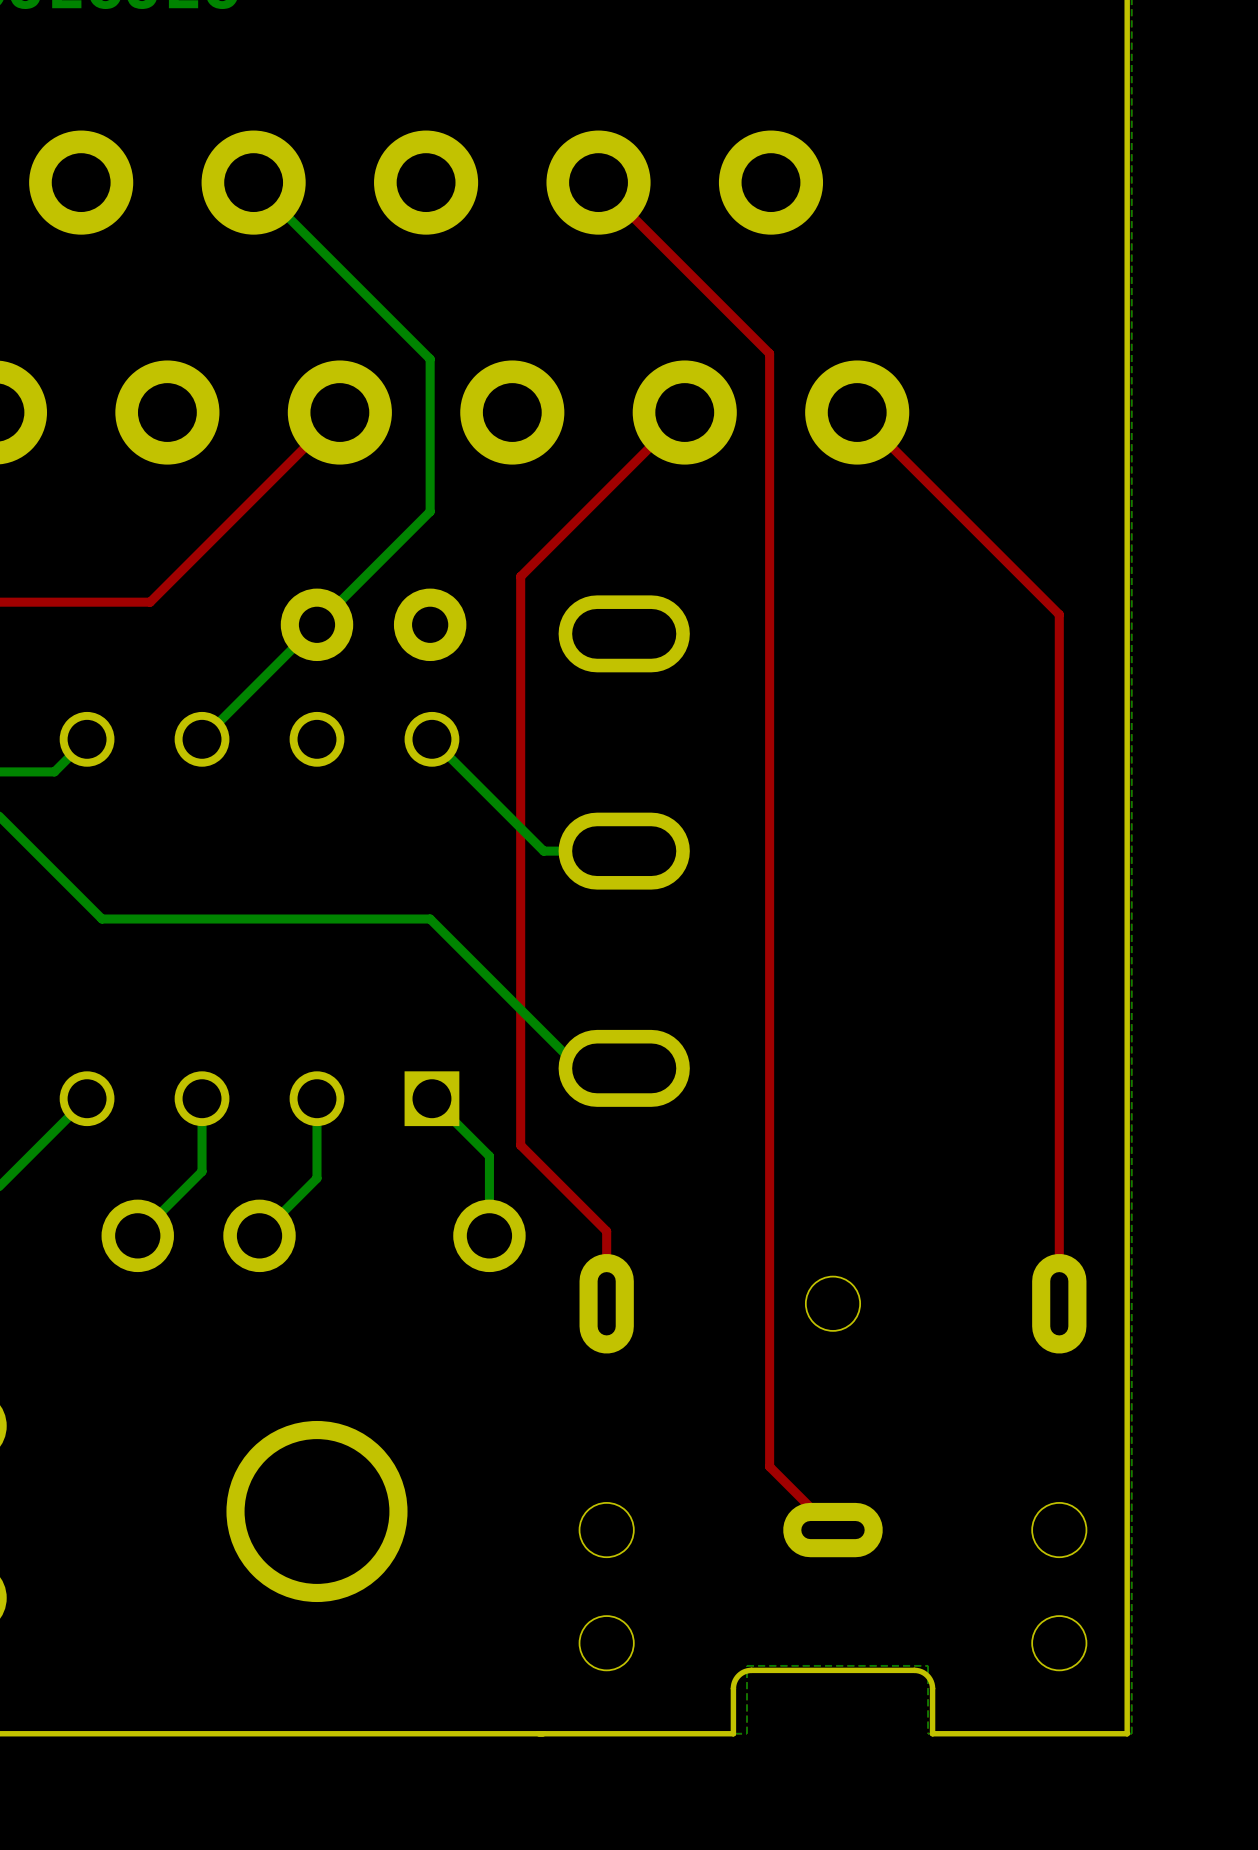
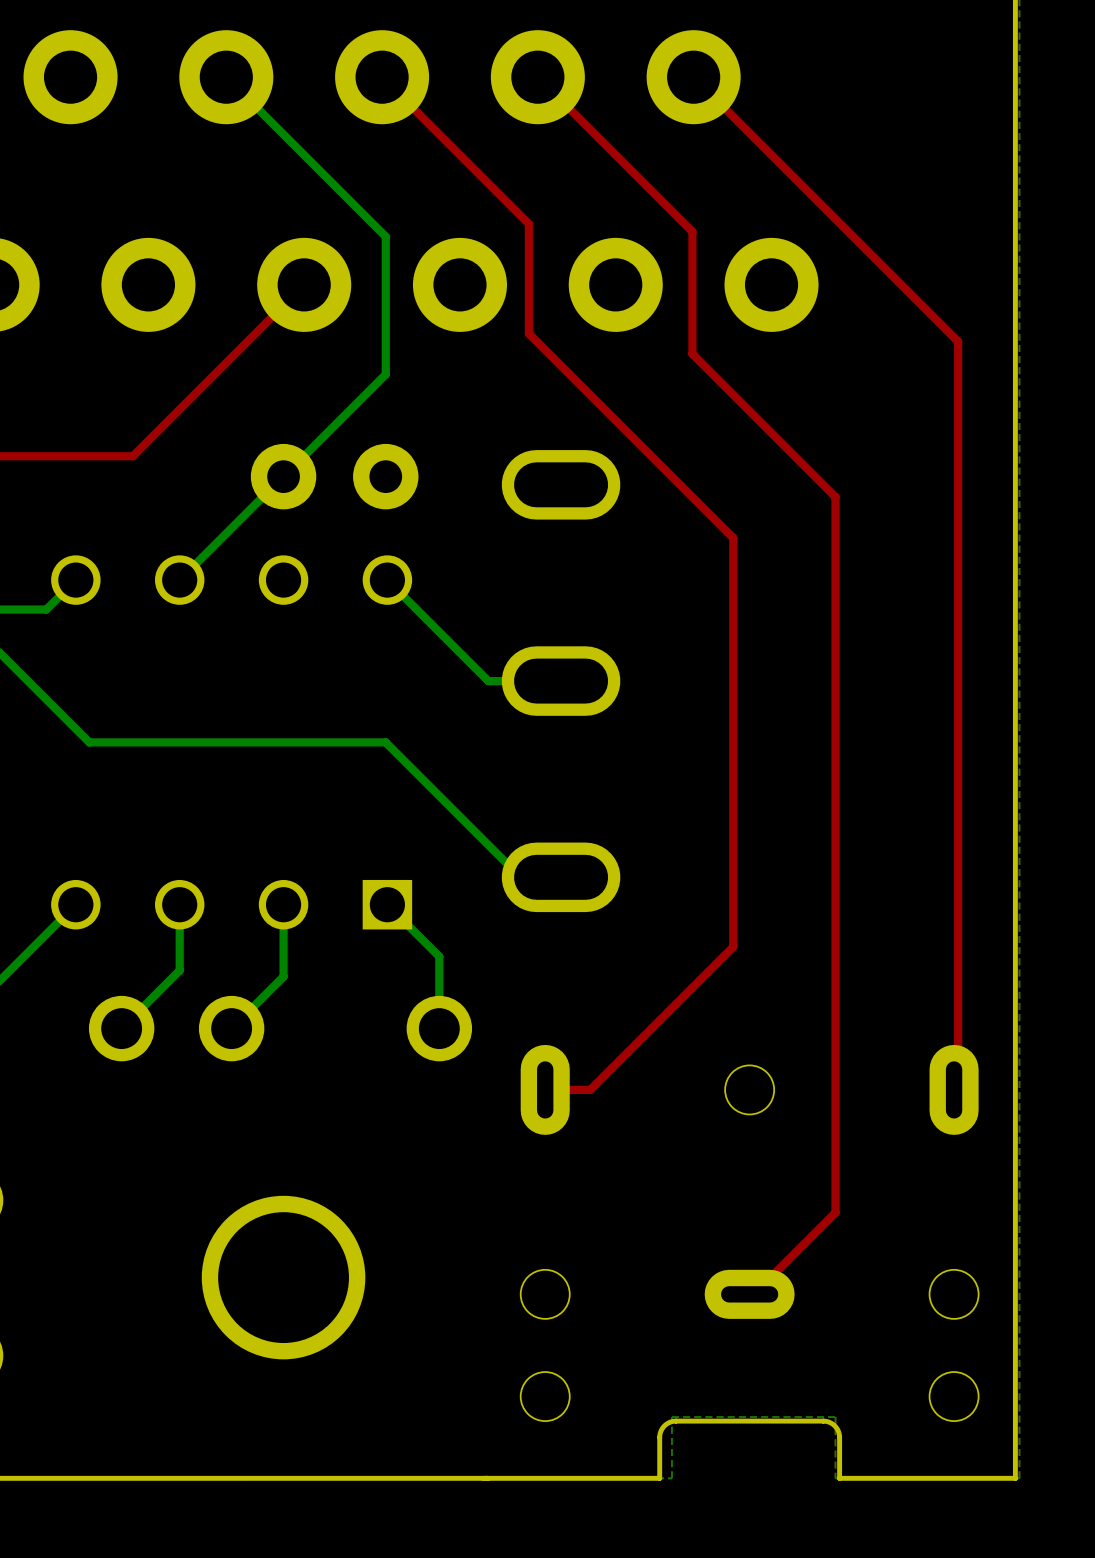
top track: none -> (382, 77) (528, 223) (528, 333) (733, 537) (733, 946) (590, 1089) (549, 1089)
top track: none -> (693, 77) (958, 341) (958, 1089)
top track: (684, 412) (520, 576) (520, 1145) (606, 1231) (606, 1303) -> none
top track: (857, 412) (1059, 614) (1059, 1303) -> none
top track: (769, 489) (769, 1466) (832, 1530) -> (692, 353) (835, 497) (835, 1212) (753, 1294)

